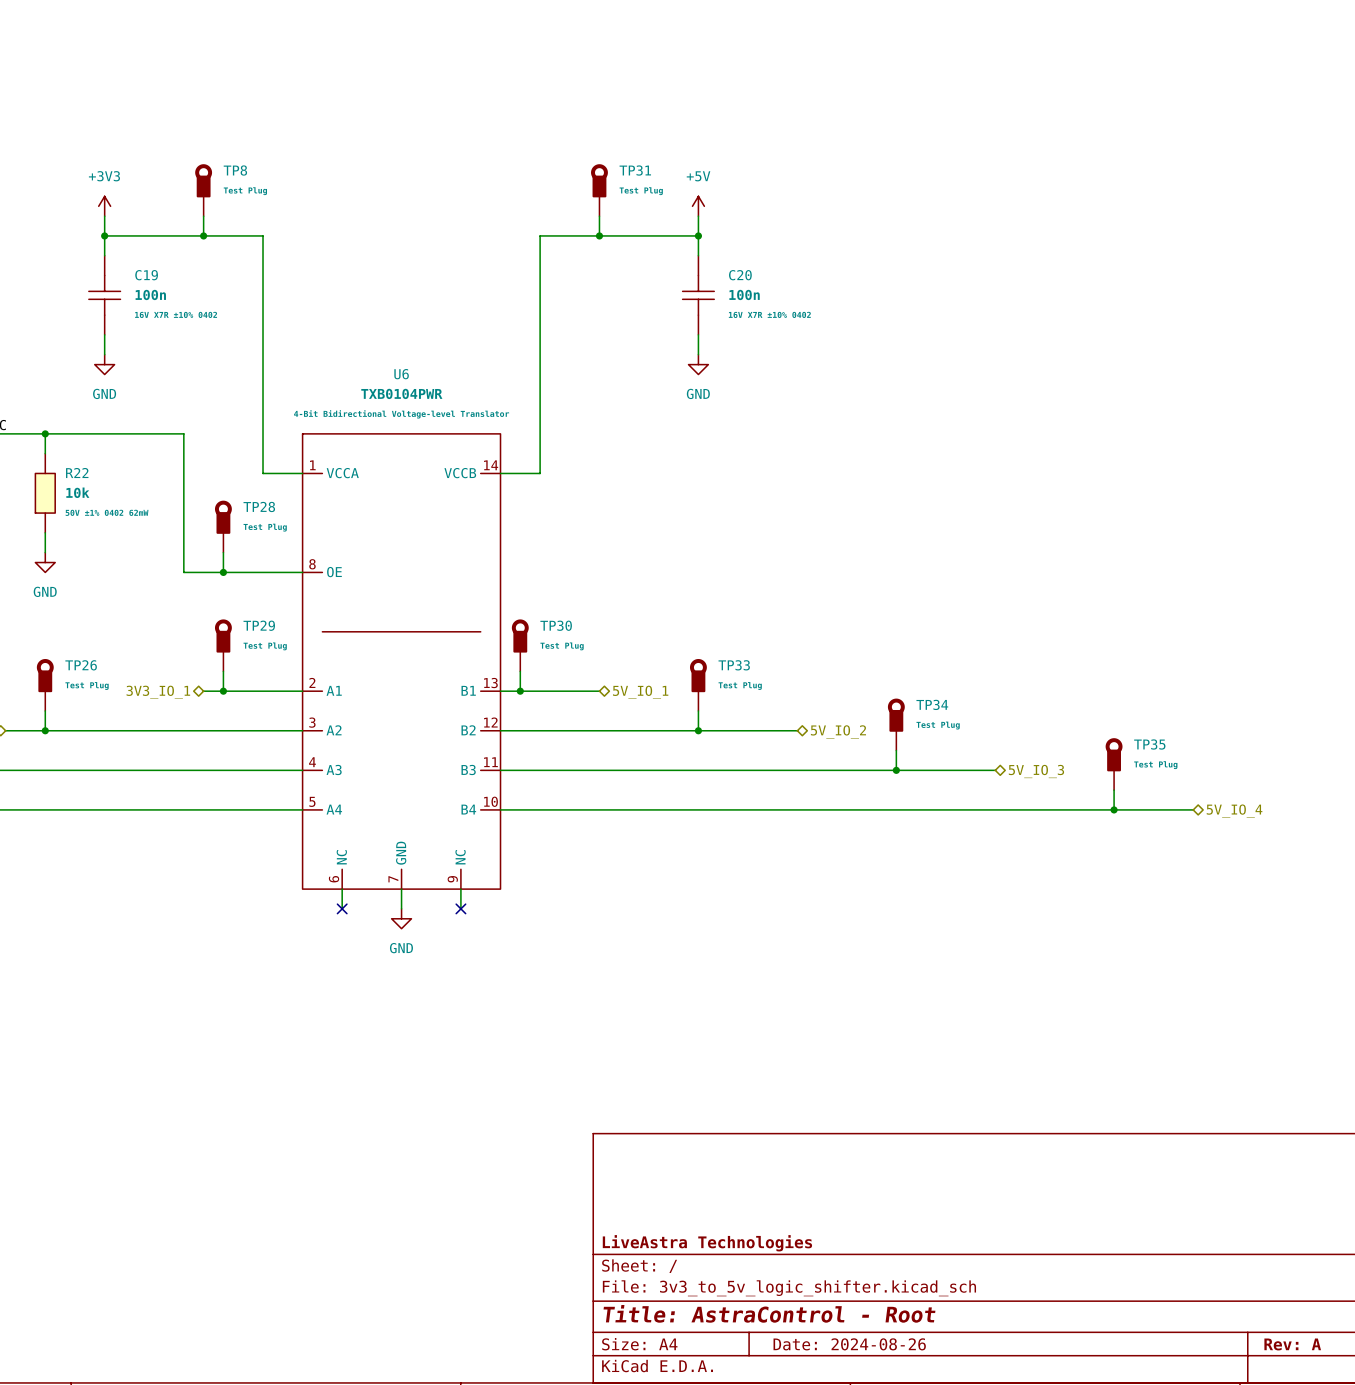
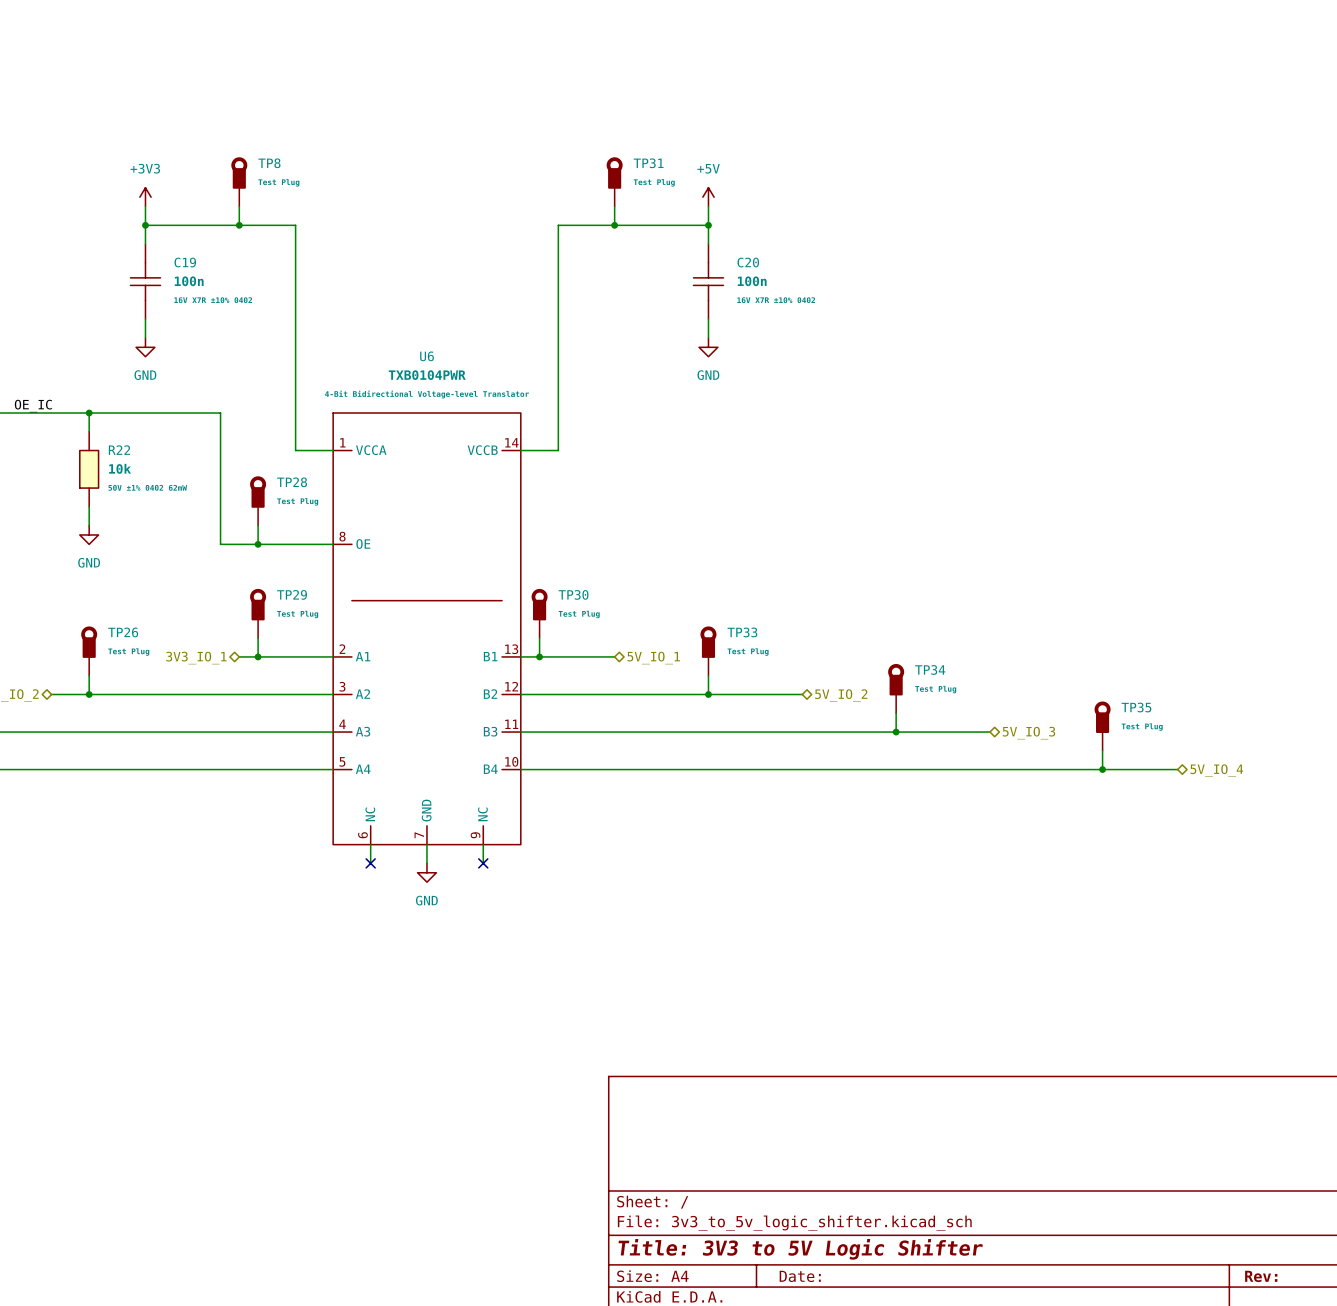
title block: LiveAstra Technologies (707, 1243) -> none
title block: Title: AstraControl - Root (769, 1313) -> Title: 3V3 to 5V Logic Shifter (800, 1249)
title block: Date: 2024-08-26 (849, 1344) -> Date: (800, 1276)
title block: Rev: A (1292, 1344) -> Rev: (1261, 1276)

